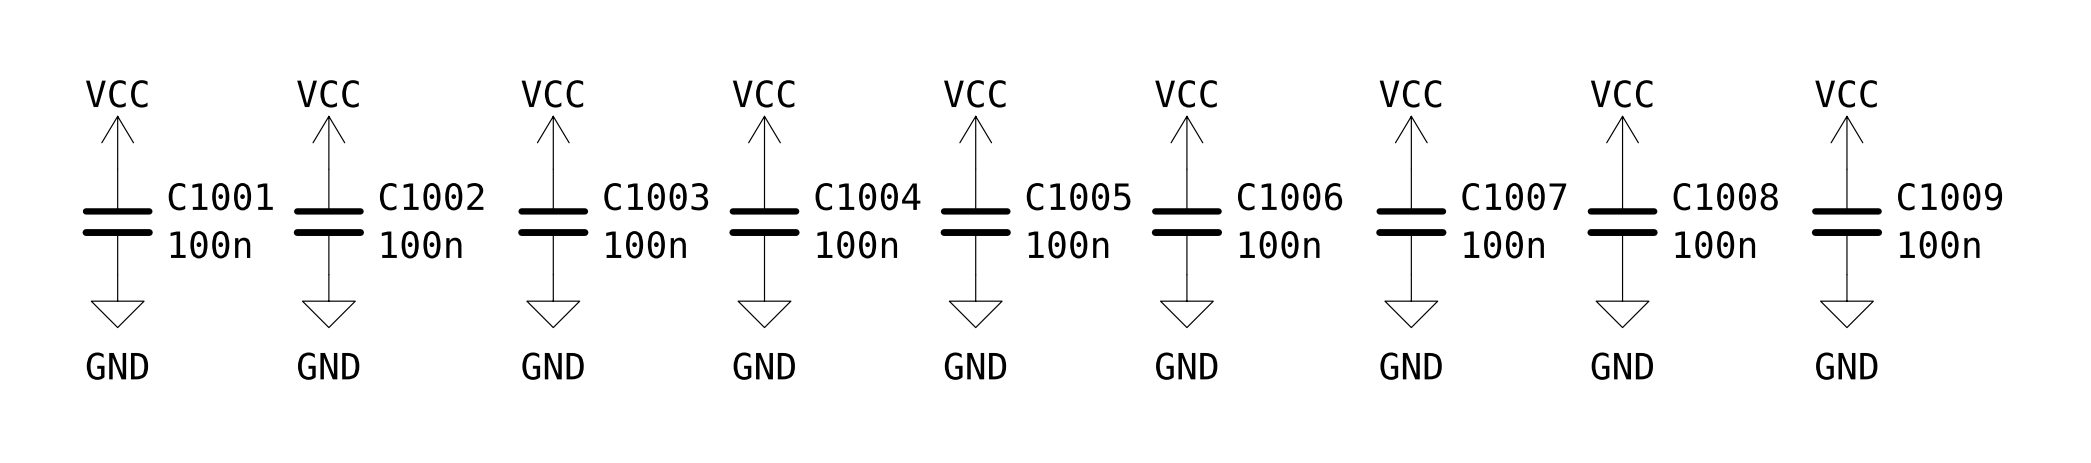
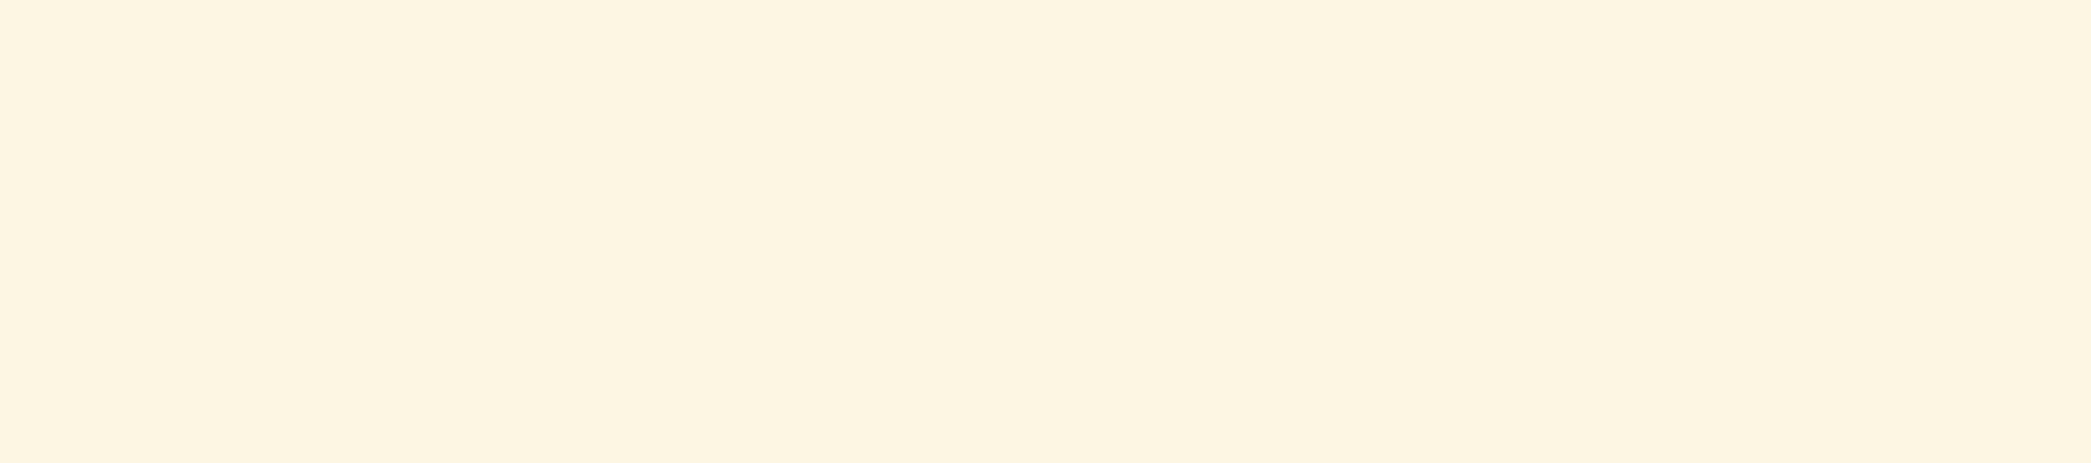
power symbol: VCC (117, 142) -> none
power symbol: VCC (328, 142) -> none
power symbol: VCC (553, 142) -> none
power symbol: VCC (764, 142) -> none
power symbol: VCC (975, 142) -> none
power symbol: VCC (1186, 142) -> none
power symbol: VCC (1411, 142) -> none
power symbol: VCC (1622, 142) -> none
power symbol: VCC (1846, 142) -> none
C1001: 100n (117, 221) -> none
C1002: 100n (328, 221) -> none
C1003: 100n (553, 221) -> none
C1004: 100n (764, 221) -> none
C1005: 100n (975, 221) -> none
C1006: 100n (1186, 221) -> none
C1007: 100n (1411, 221) -> none
C1008: 100n (1622, 221) -> none
C1009: 100n (1846, 221) -> none
power symbol: GND (117, 301) -> none
power symbol: GND (328, 301) -> none
power symbol: GND (553, 301) -> none
power symbol: GND (764, 301) -> none
power symbol: GND (975, 301) -> none
power symbol: GND (1186, 301) -> none
power symbol: GND (1411, 301) -> none
power symbol: GND (1622, 301) -> none
power symbol: GND (1846, 301) -> none

